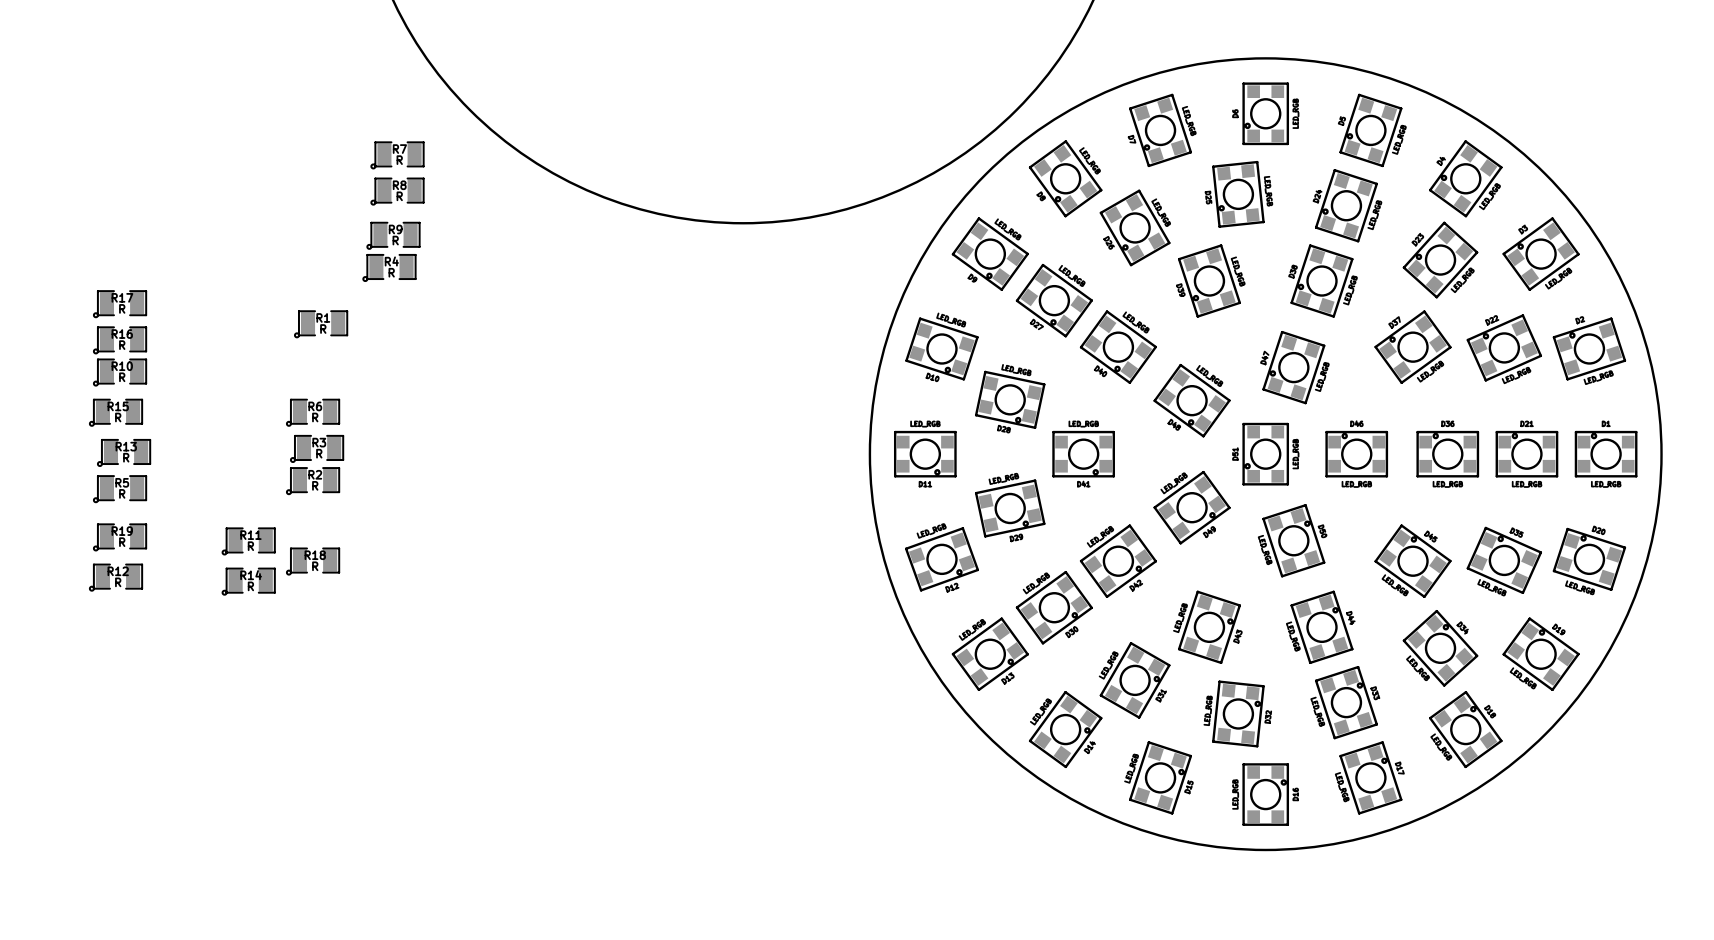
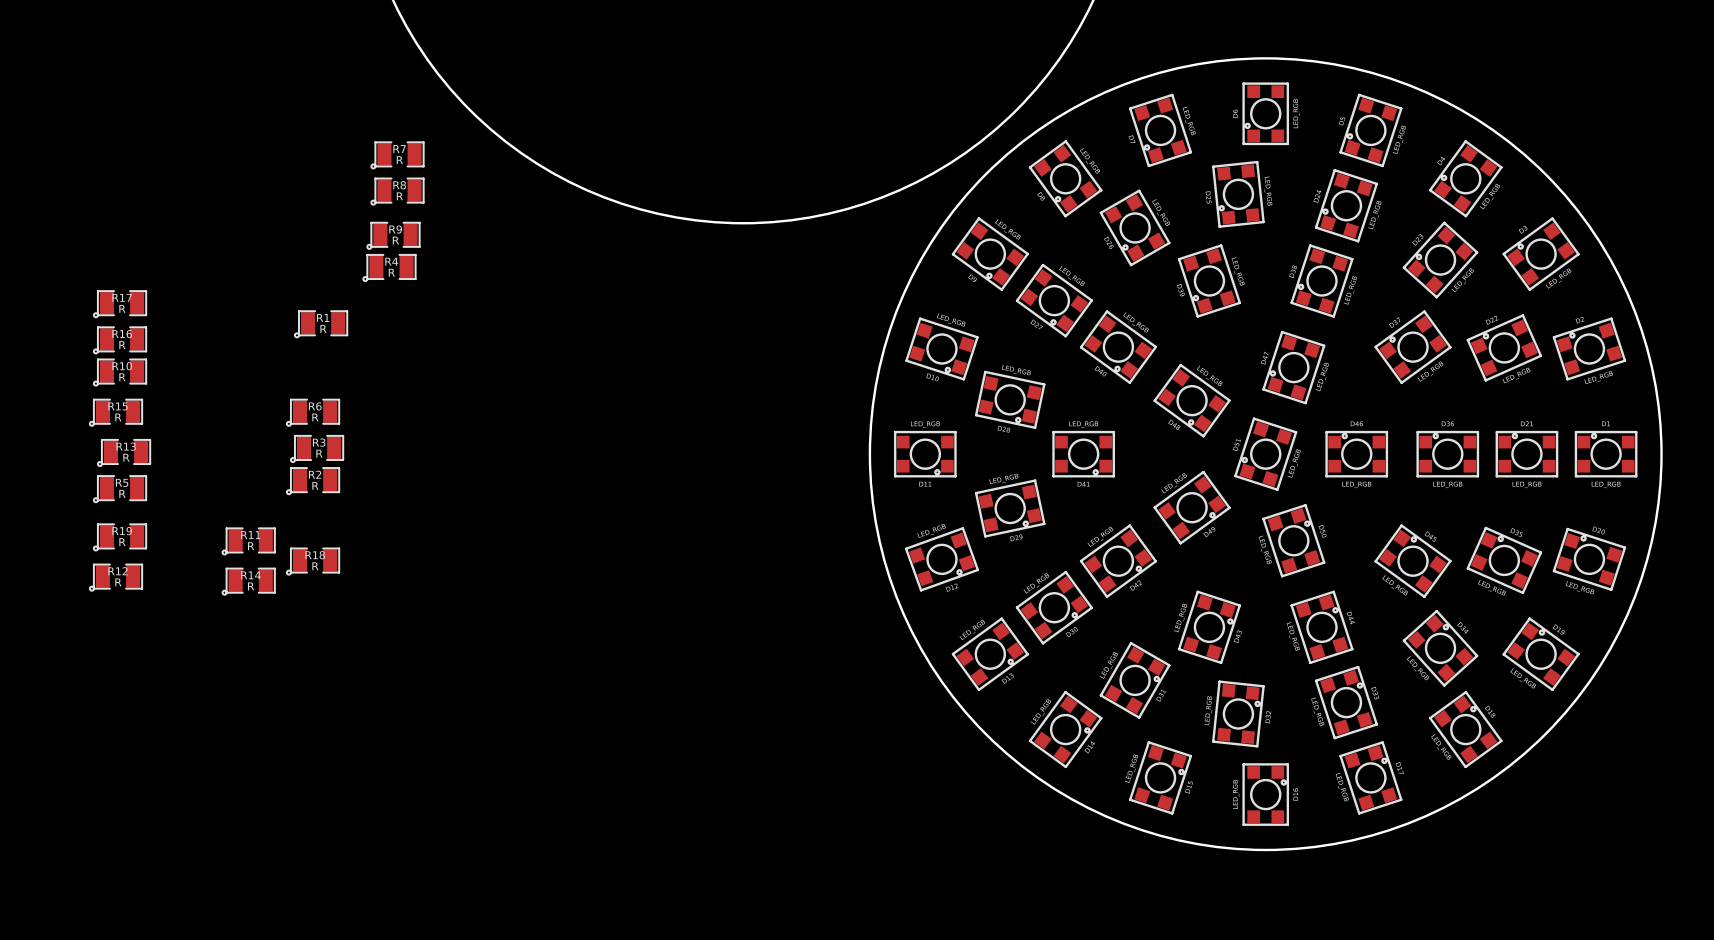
part rotation: 0° (1265, 454) -> 18° clockwise (1265, 454)

